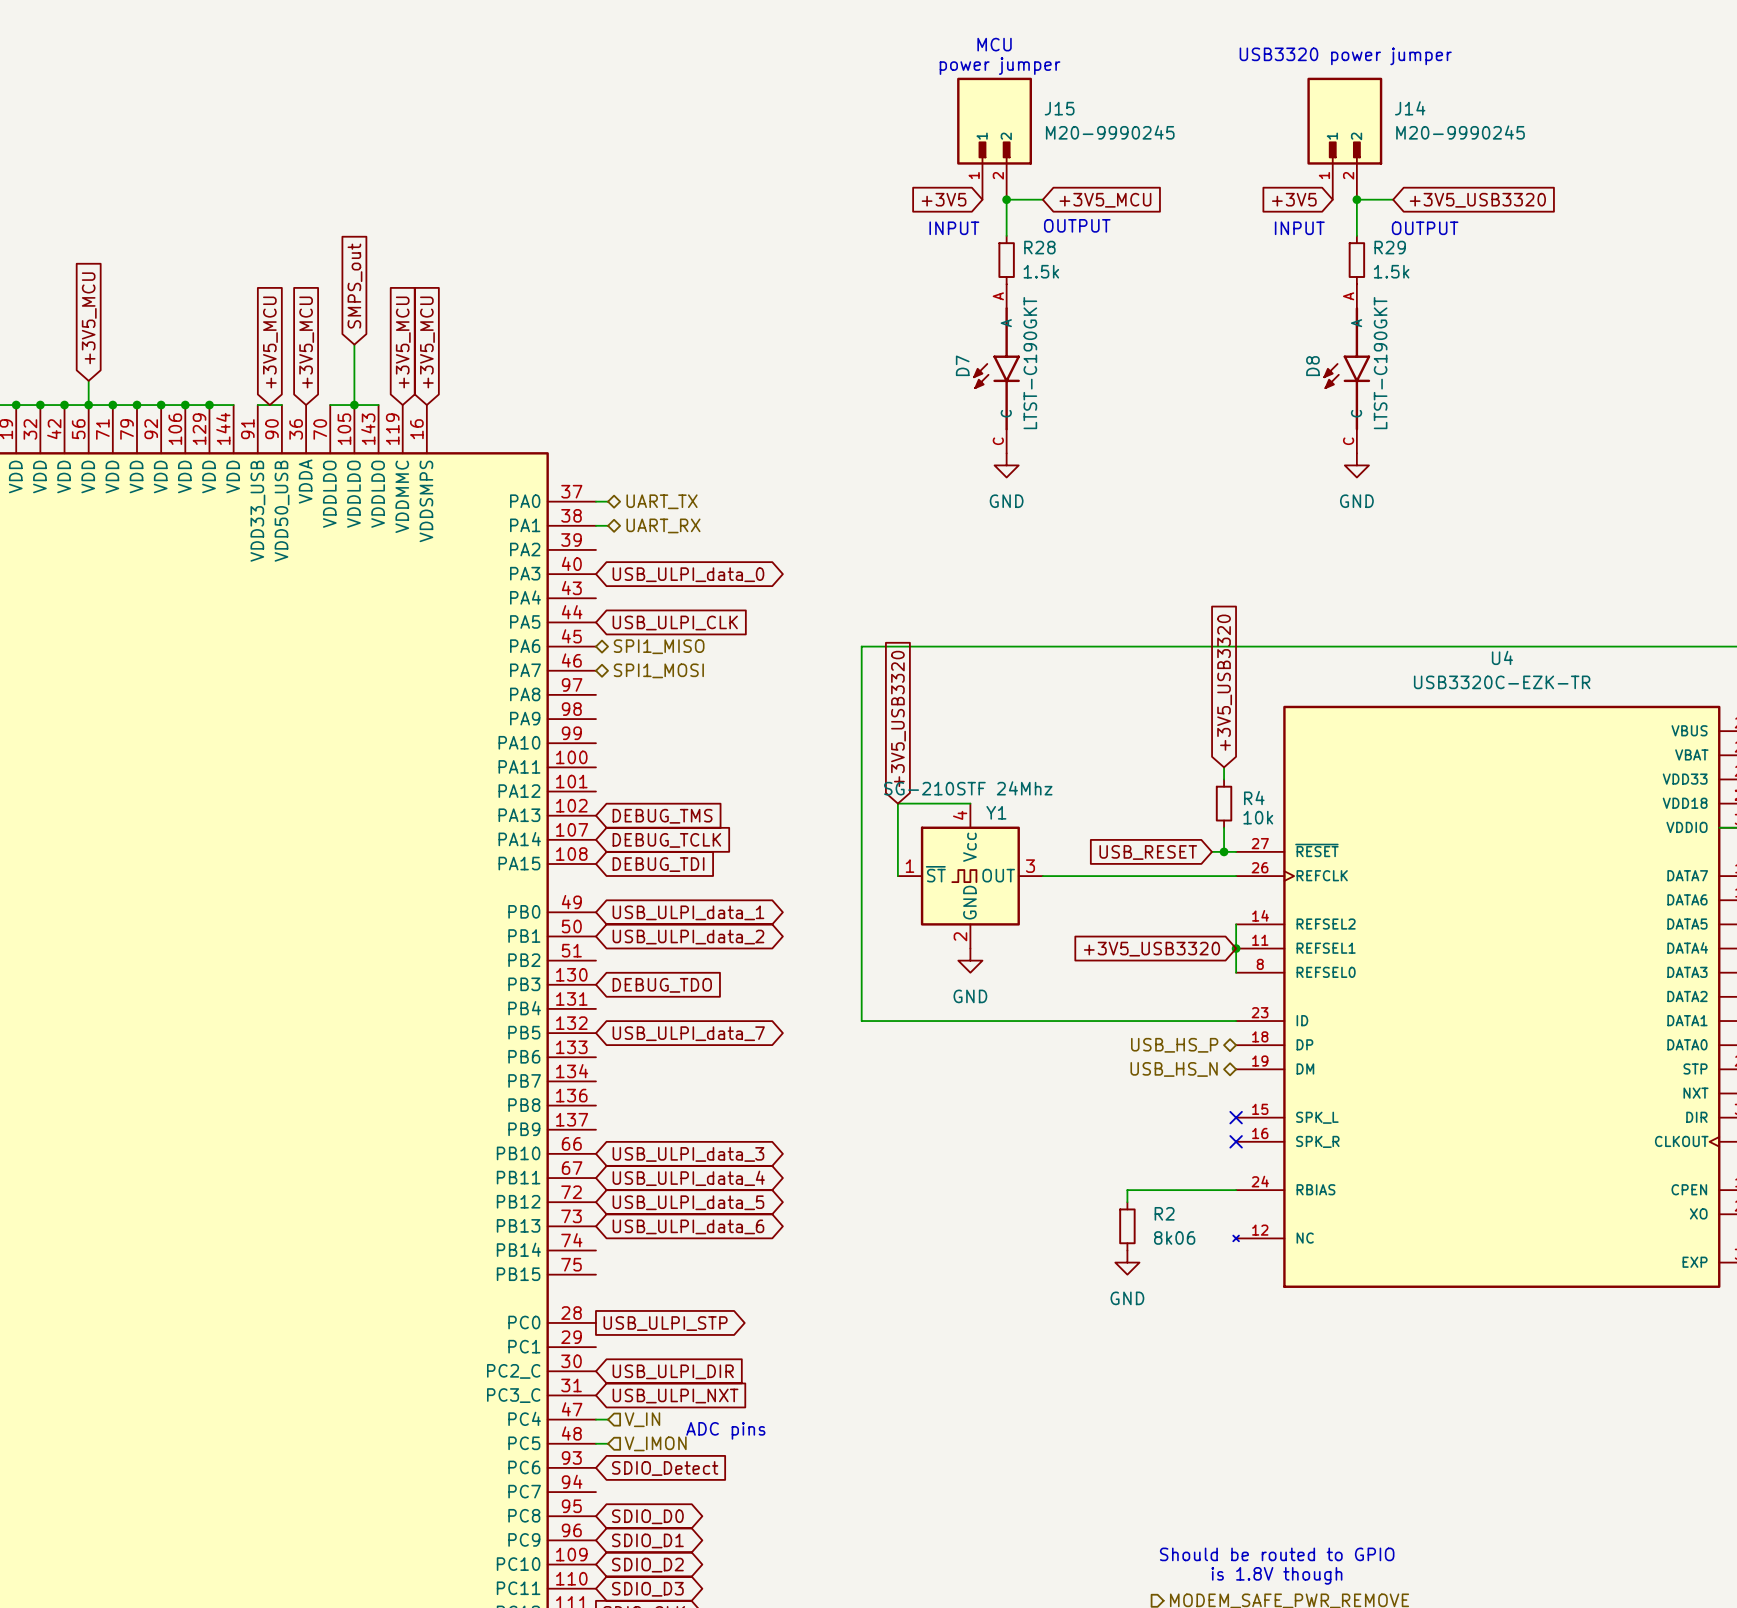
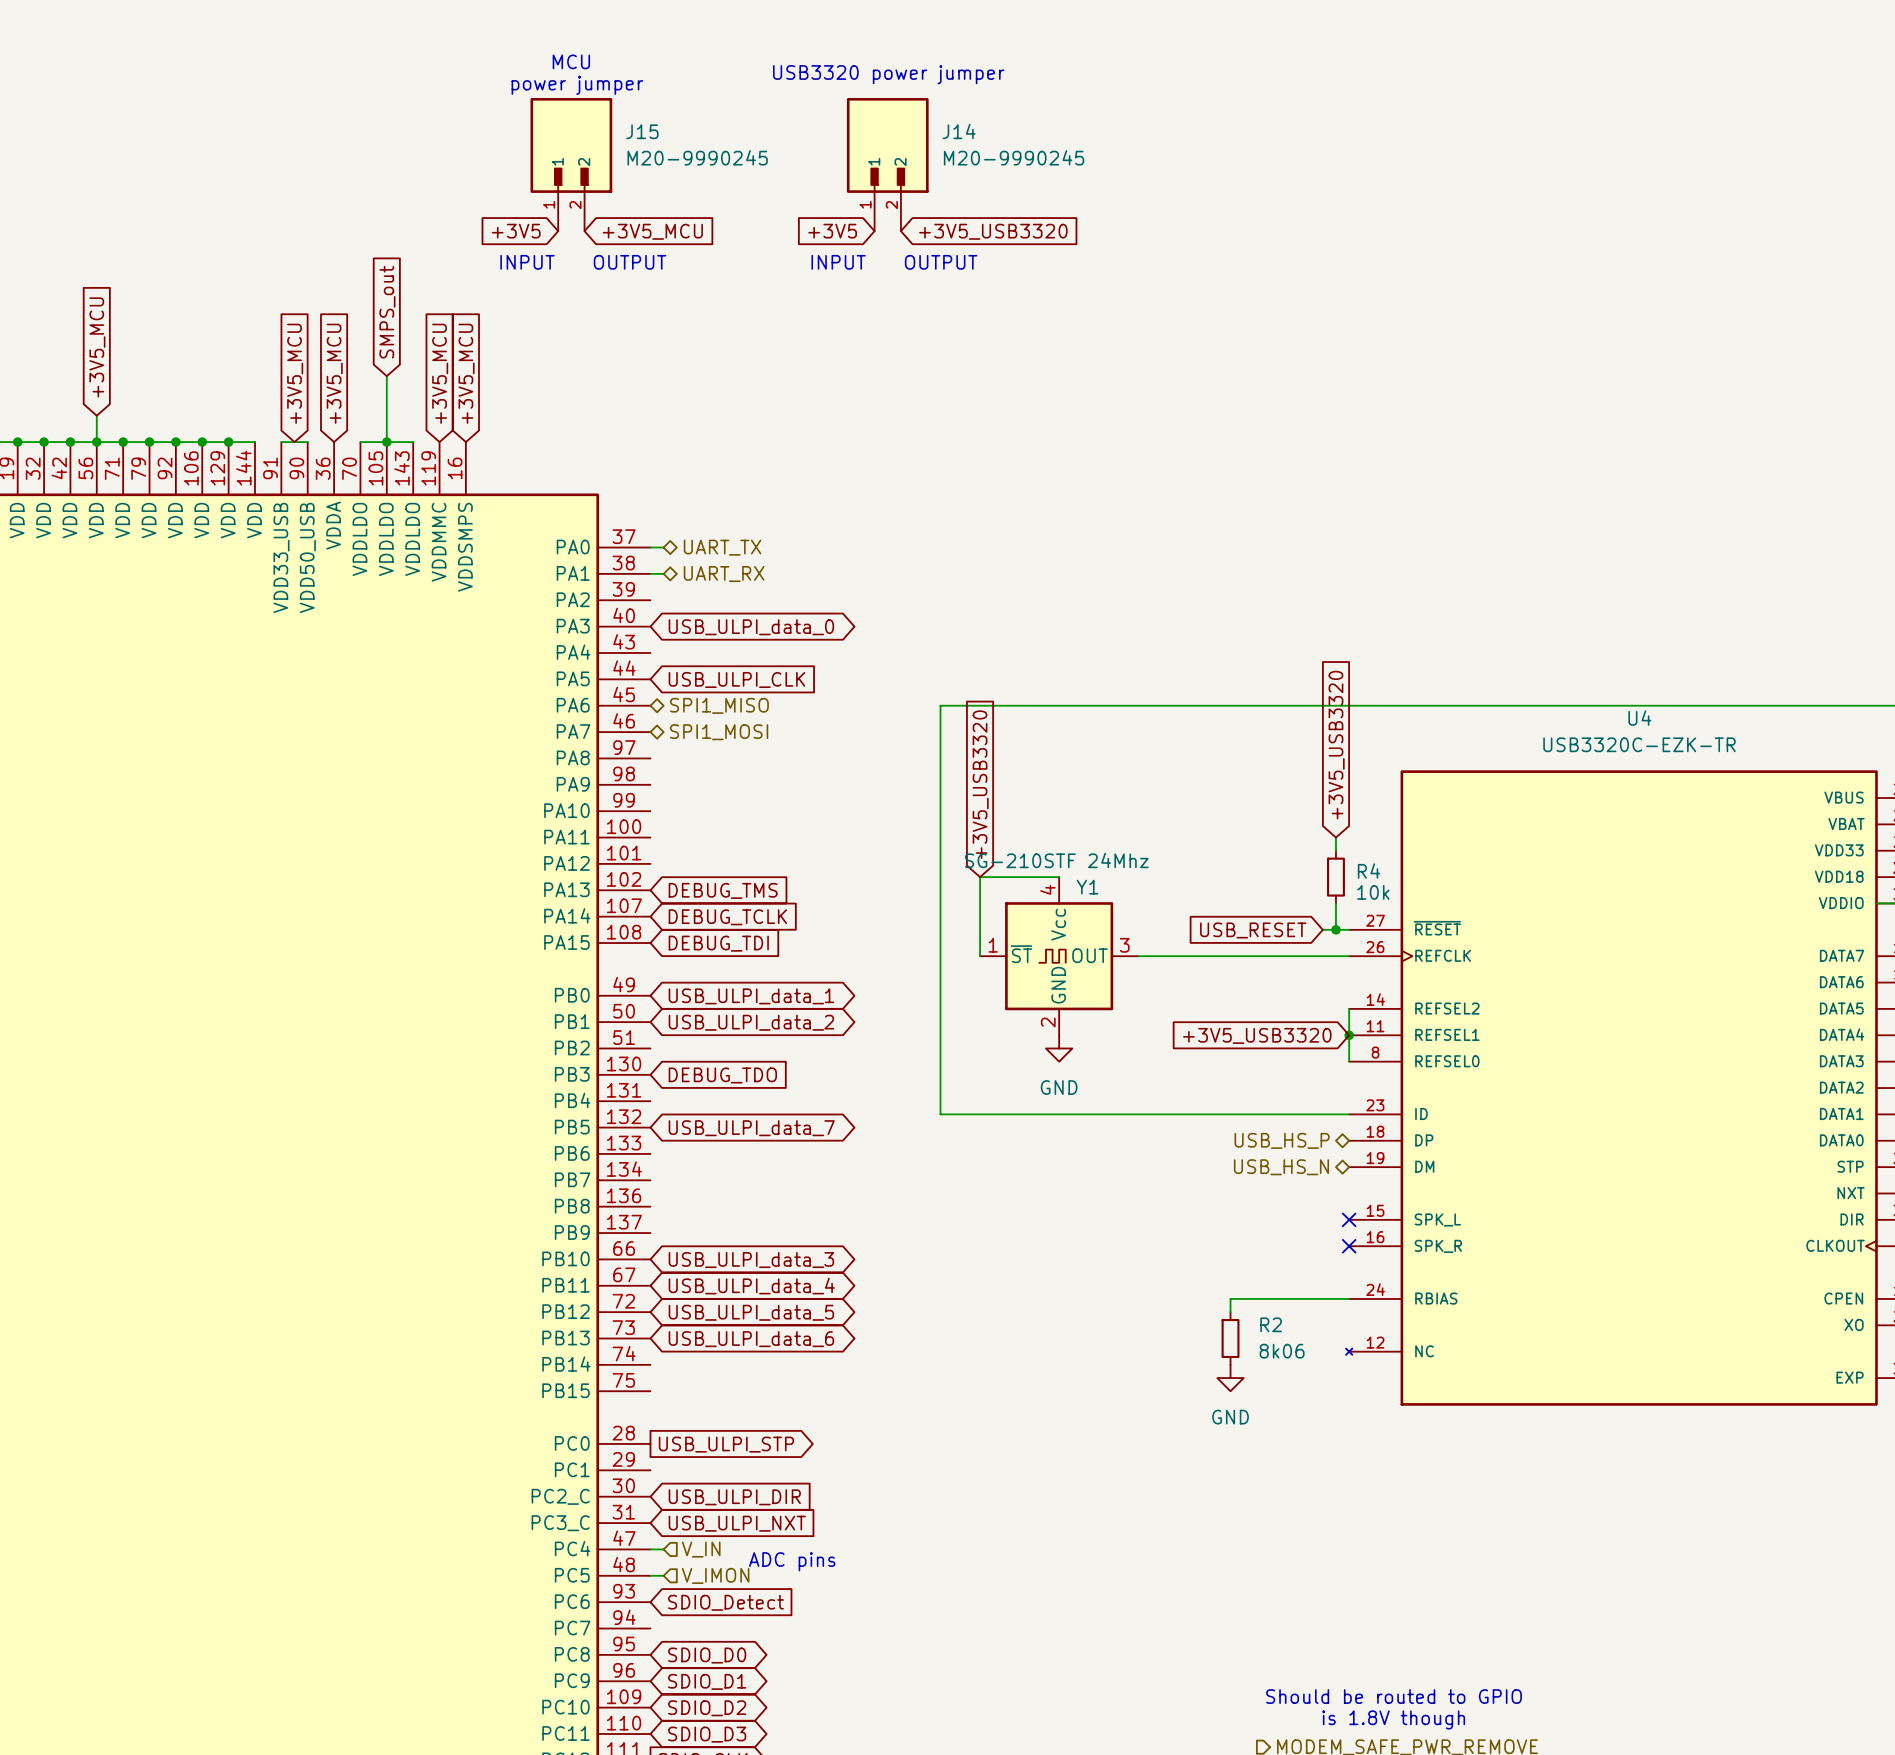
text: MCU (994, 44) -> none
text: none -> MCU (571, 61)
text: USB3320 power jumper (1345, 56) -> none
text: power jumper (1000, 66) -> USB3320 power jumper (888, 74)
text: none -> power jumper (577, 85)
J15 position: (994, 138) -> (571, 164)
J14 position: (1344, 138) -> (887, 164)
global label position: +3V5 (944, 199) -> +3V5 (832, 231)
junction: (1006, 199) -> none
wire: (1042, 199) (1006, 199) (1006, 235) -> none
global label: +3V5 (1294, 199) -> none
junction: (1356, 199) -> none
wire: (1393, 199) (1356, 199) (1356, 235) -> none
global label: +3V5_MCU (1105, 200) -> none
global label: +3V5_USB3320 (1477, 200) -> none
global label: none -> +3V5 (516, 231)
global label: none -> +3V5_MCU (652, 231)
global label: none -> +3V5_USB3320 (993, 231)
text position: OUTPUT (1077, 225) -> OUTPUT (941, 262)
text position: INPUT (954, 228) -> INPUT (838, 262)
text: INPUT (1299, 228) -> none
text: OUTPUT (1425, 228) -> none
text: none -> INPUT (527, 262)
text: none -> OUTPUT (630, 262)
R28: 1.5k (1006, 260) -> none
R29: 1.5k (1356, 260) -> none
D7: LTST-C190GKT (996, 368) -> none
D8: LTST-C190GKT (1346, 368) -> none
power symbol: GND (1006, 465) -> none
power symbol: GND (1356, 465) -> none

